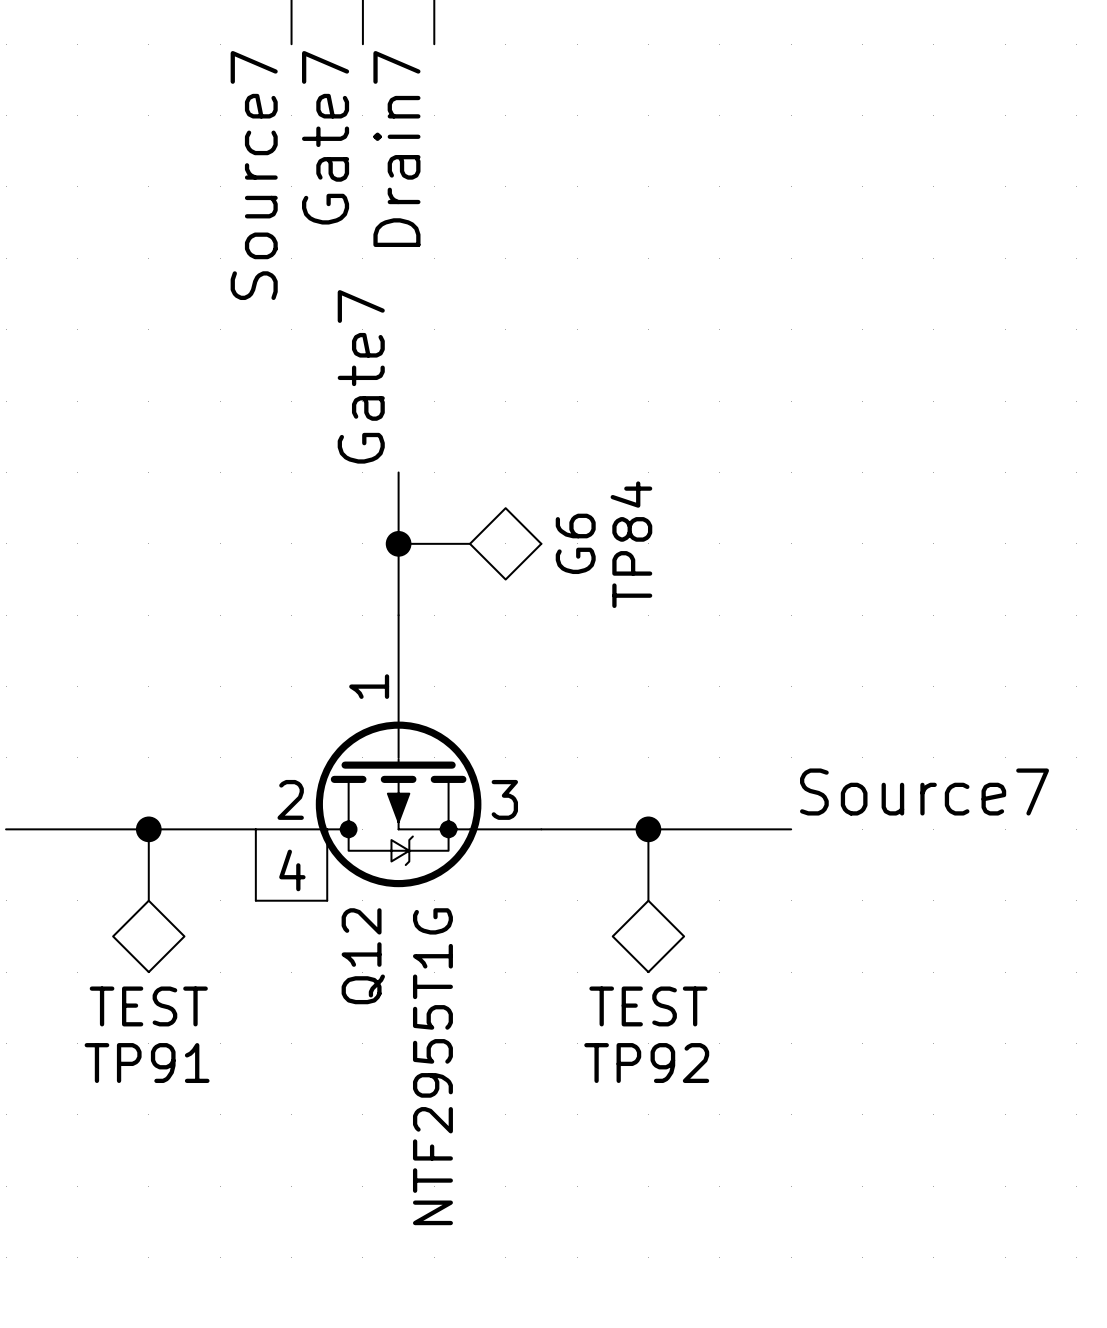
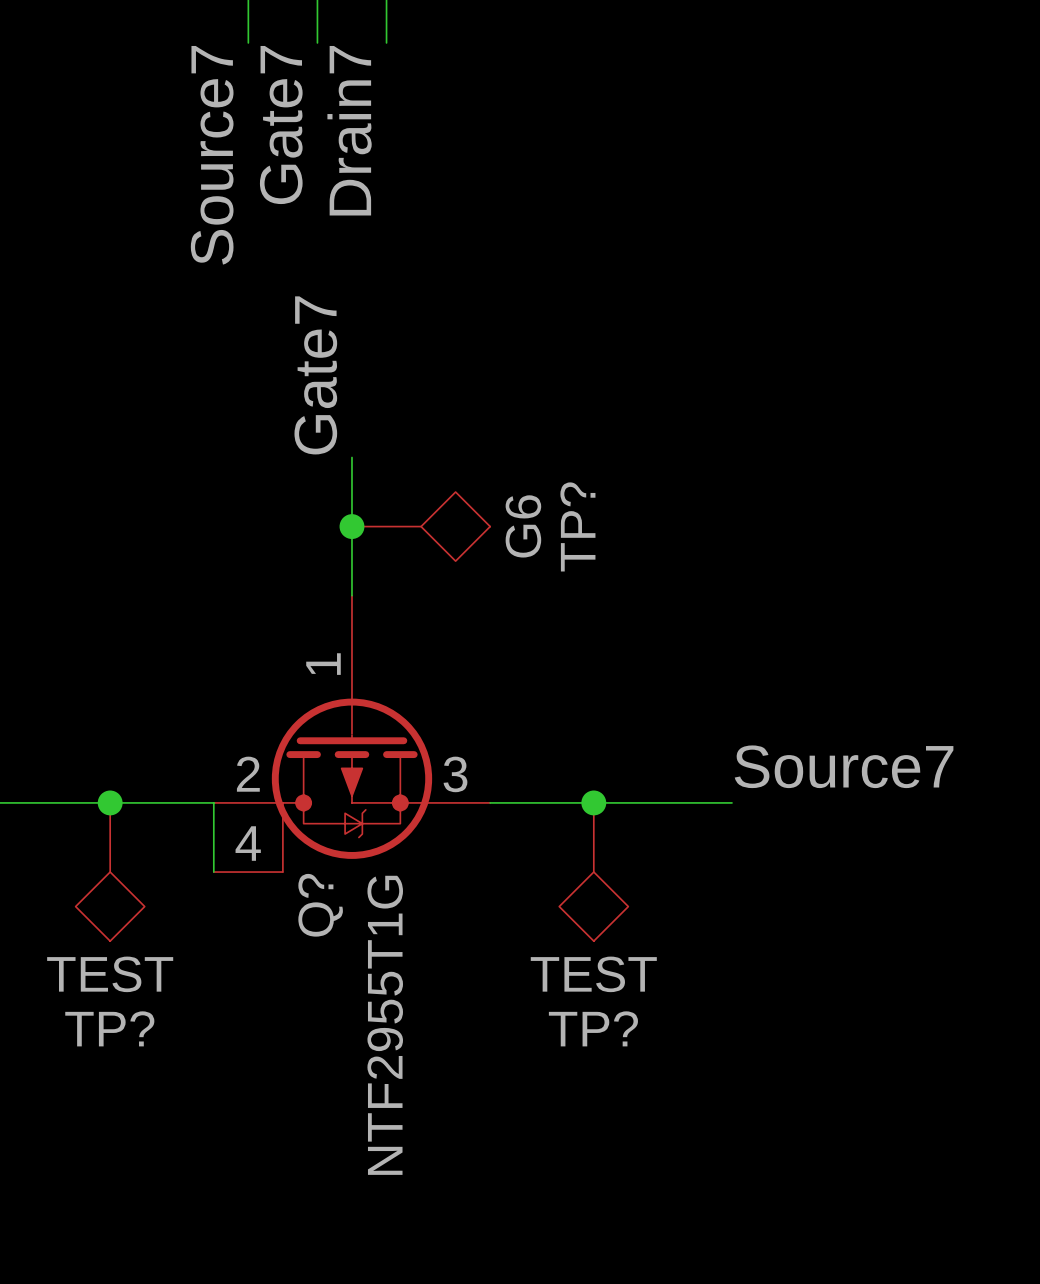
TP84 name: TP84 (631, 544) -> TP? (577, 526)
Q12 name: Q12 (363, 956) -> Q? (320, 905)
TP91 name: TP91 (147, 1063) -> TP? (109, 1028)
TP92 name: TP92 (646, 1063) -> TP? (593, 1028)

